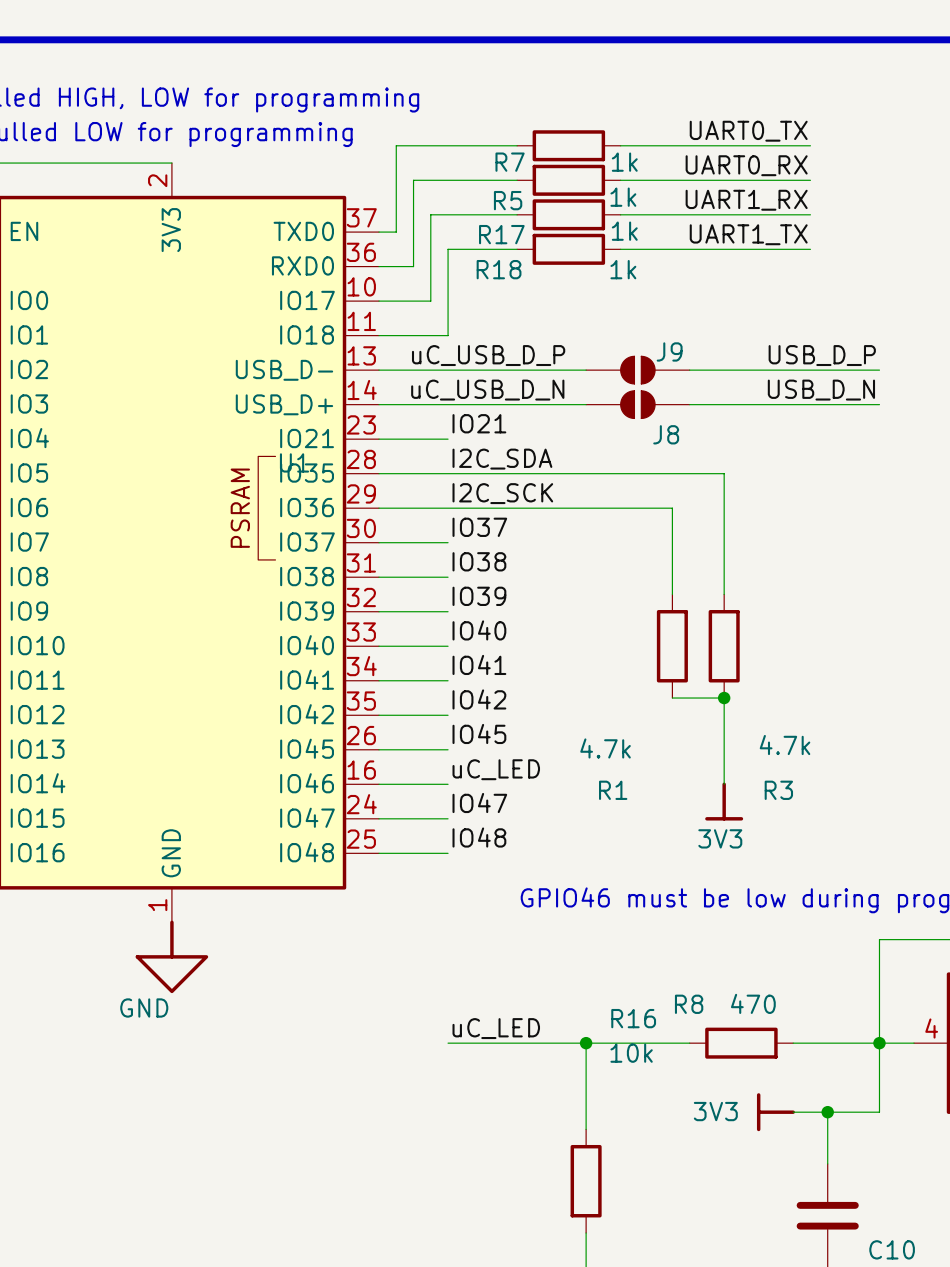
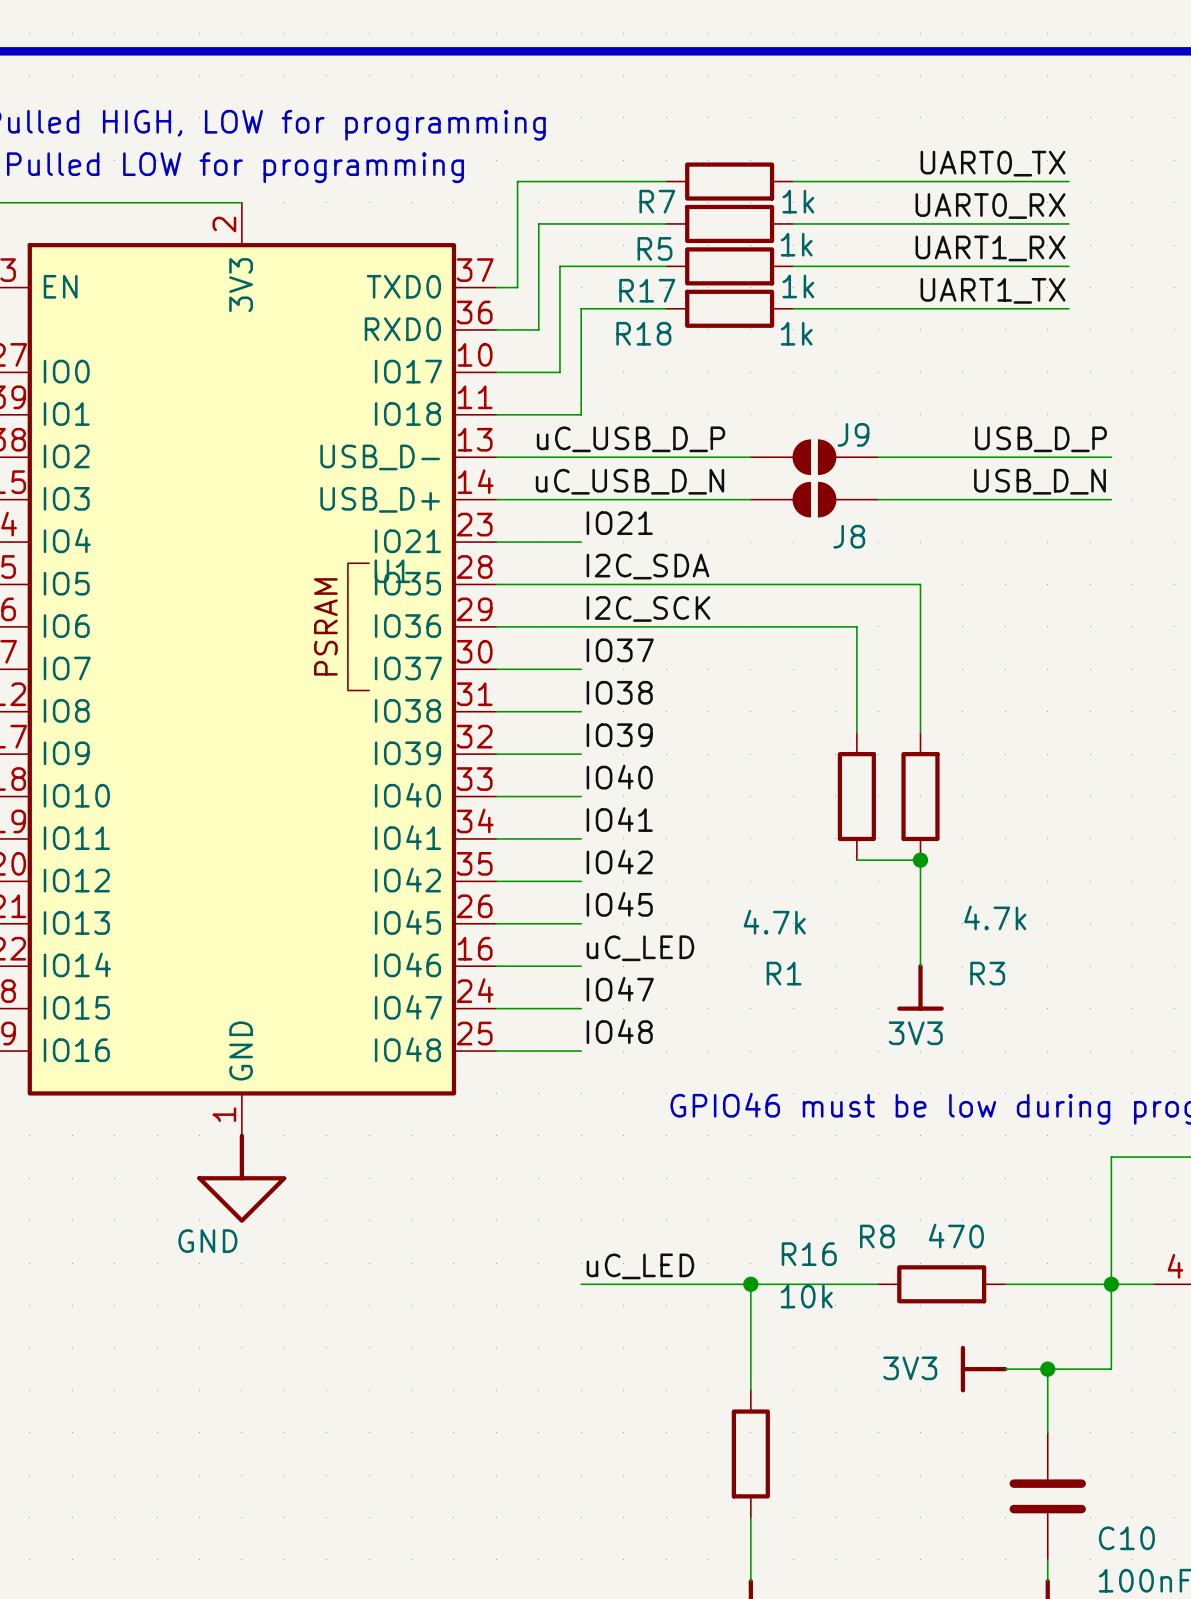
label position: UART0_TX (748, 131) -> UART0_TX (993, 163)
wire: none -> (1026, 181) (1068, 181)
label position: UART0_RX (746, 165) -> UART0_RX (990, 206)
wire: none -> (1026, 223) (1068, 223)
label position: UART1_RX (746, 200) -> UART1_RX (990, 248)
wire: none -> (1026, 266) (1068, 266)
label position: UART1_TX (748, 234) -> UART1_TX (993, 290)
wire: none -> (1026, 308) (1068, 308)

